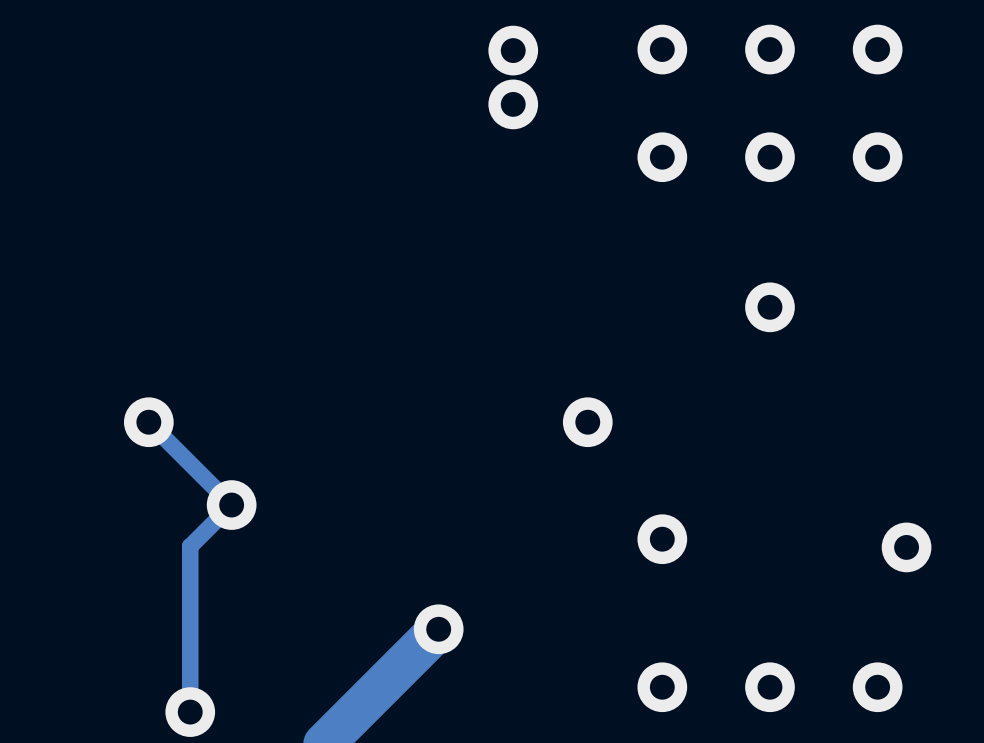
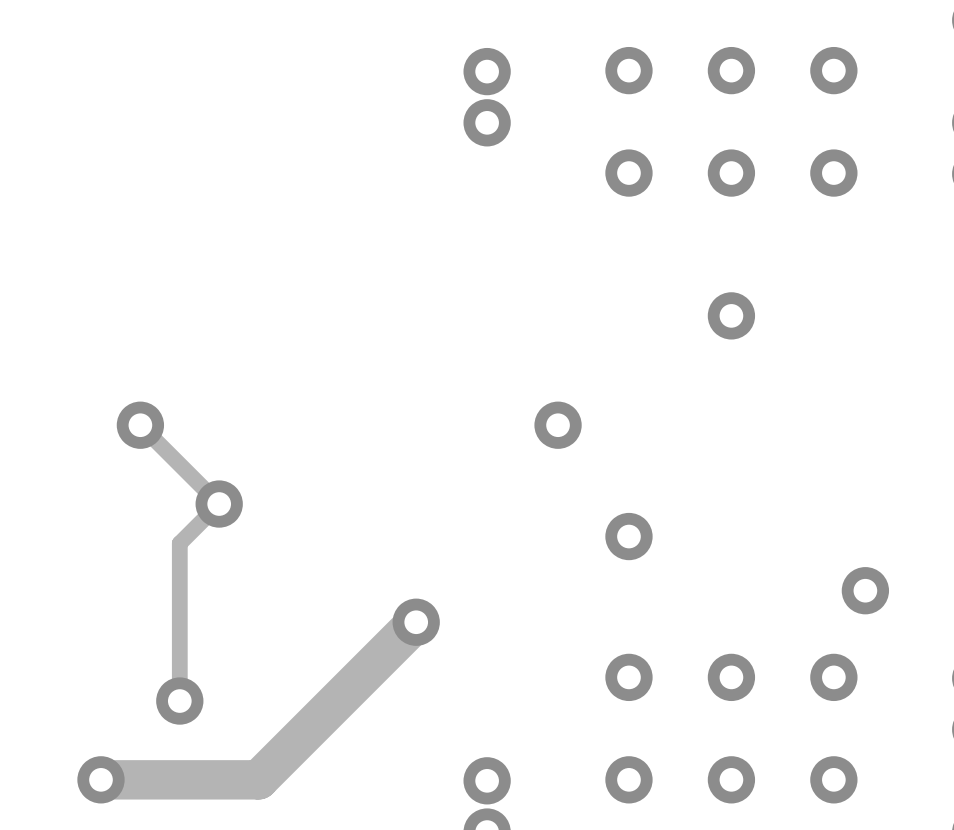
via position: (906, 547) -> (865, 590)

